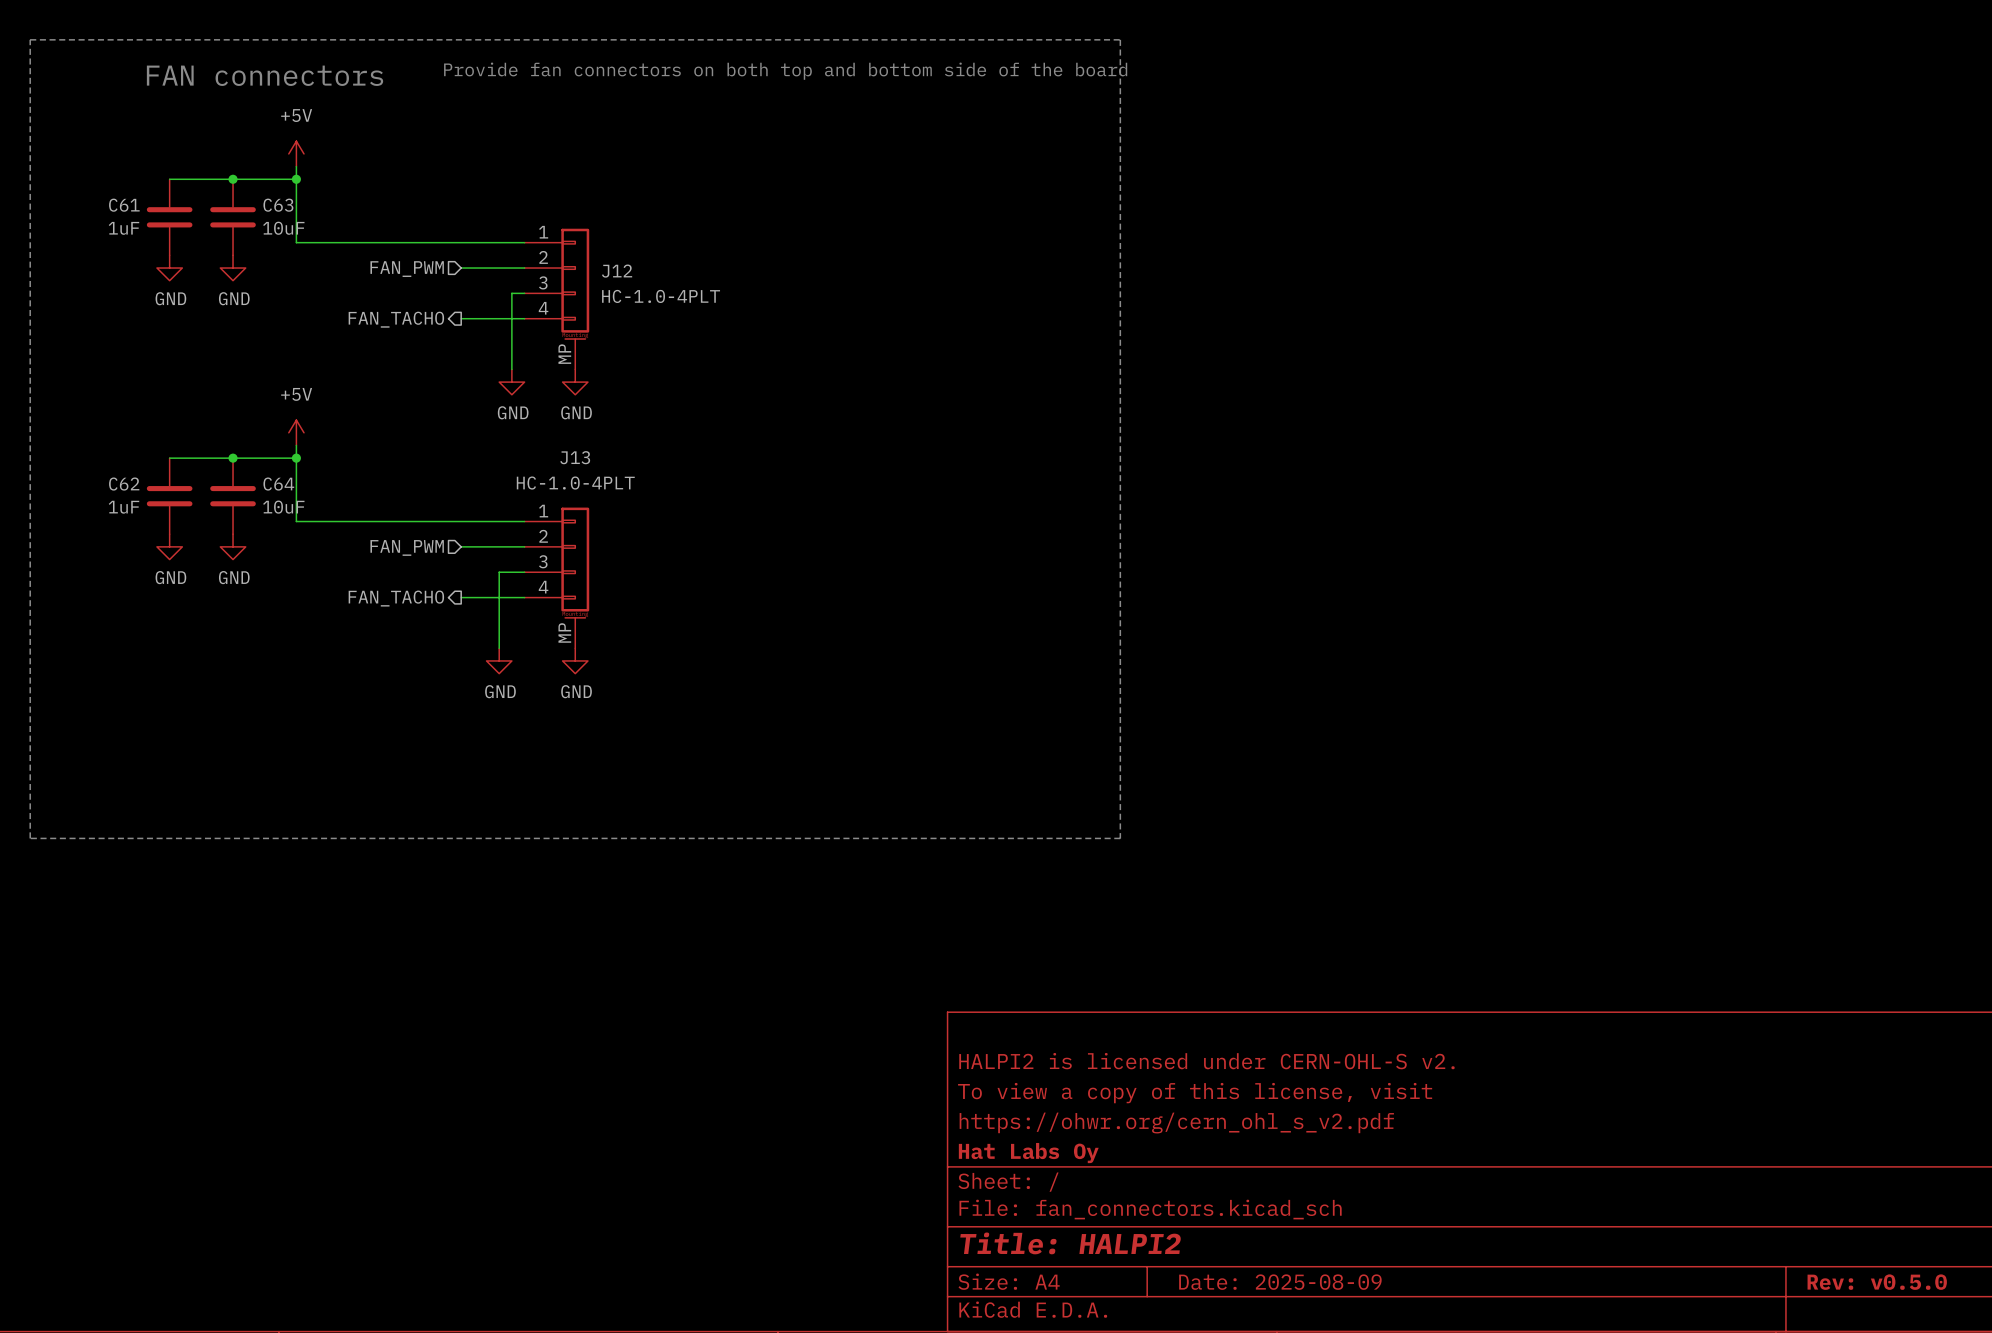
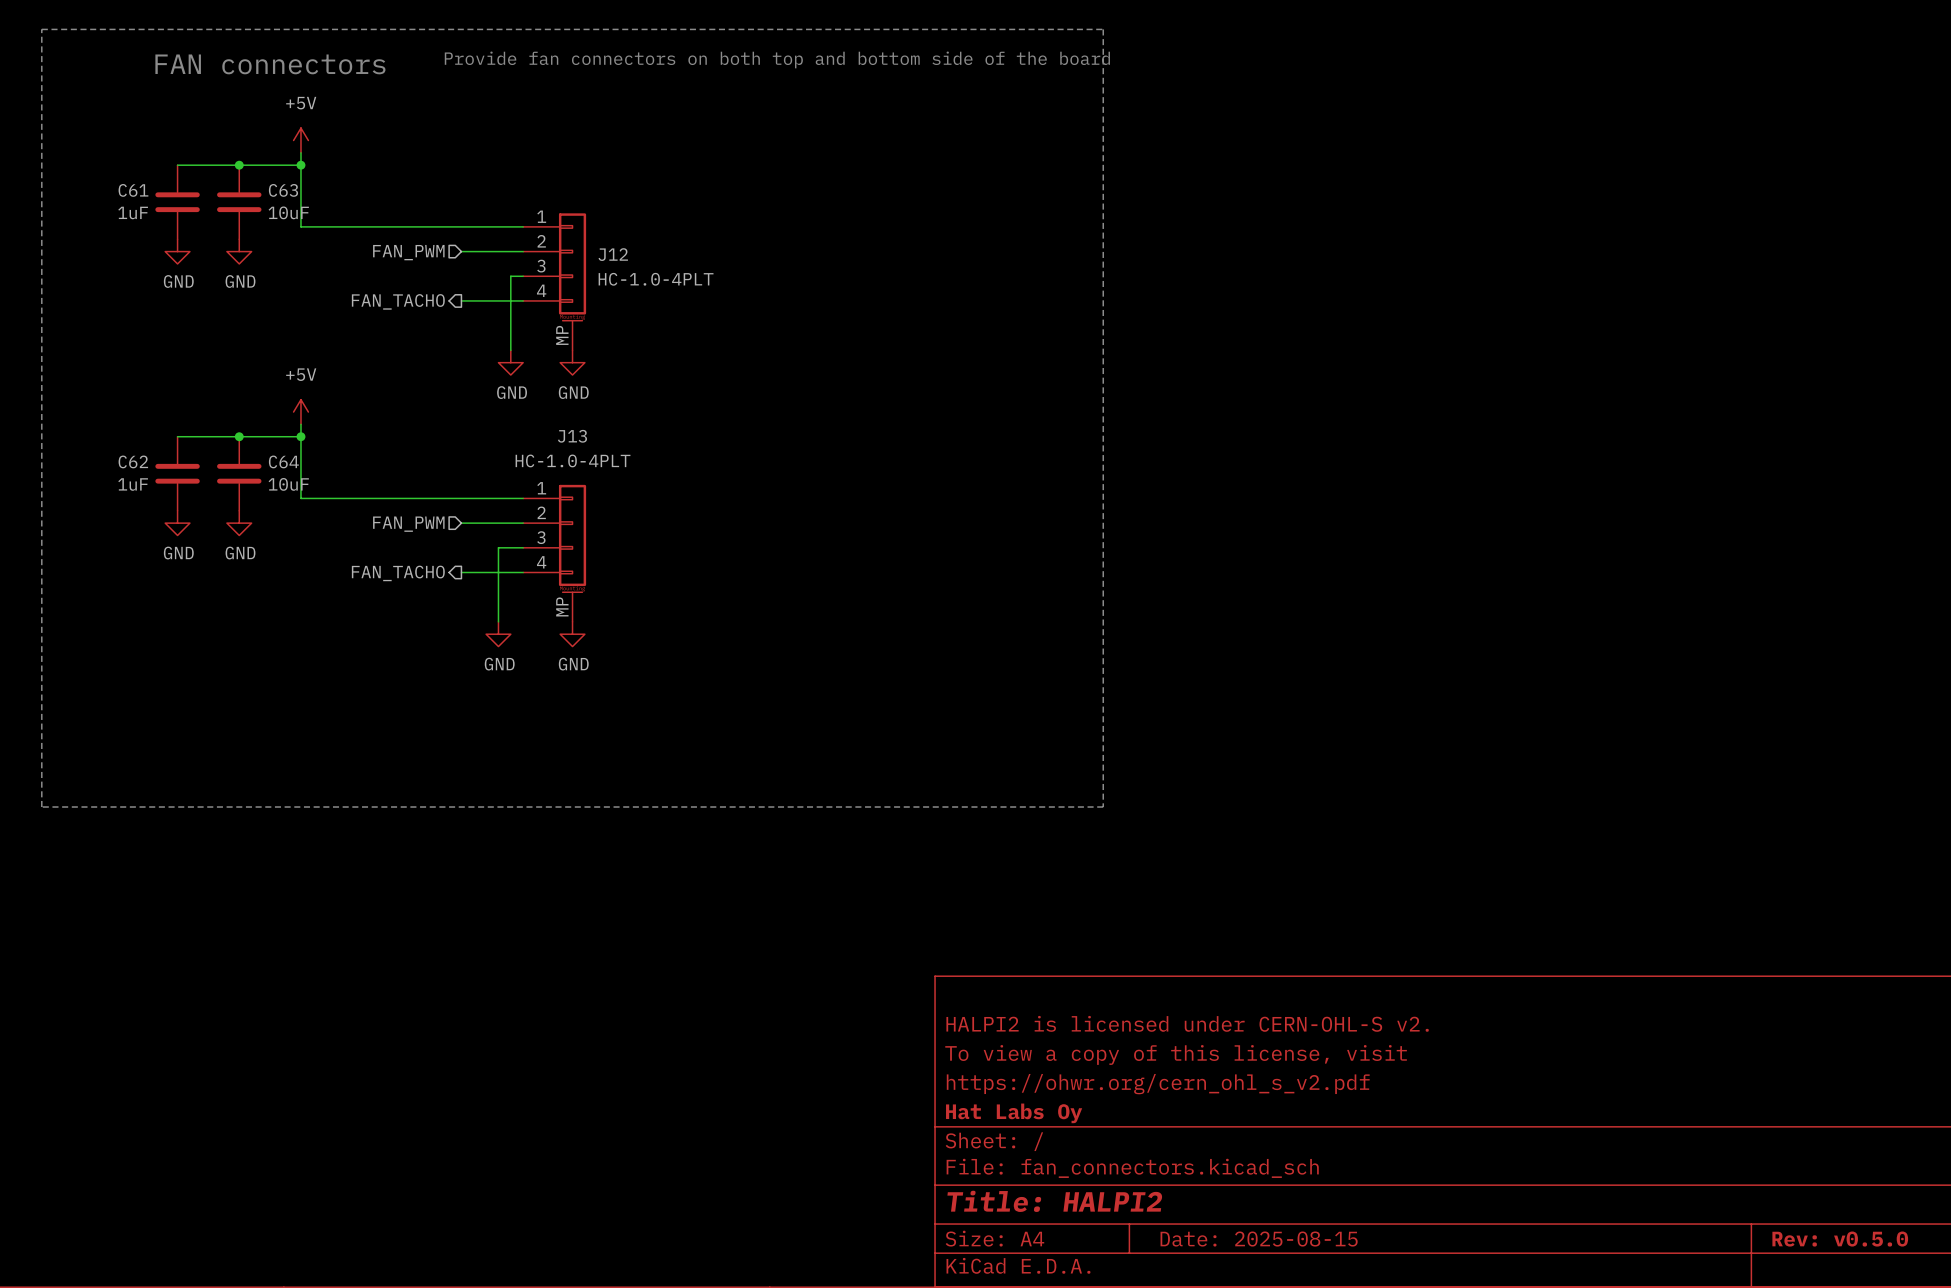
title block: Date: 2025-08-09 (1280, 1282) -> Date: 2025-08-15 (1259, 1239)

